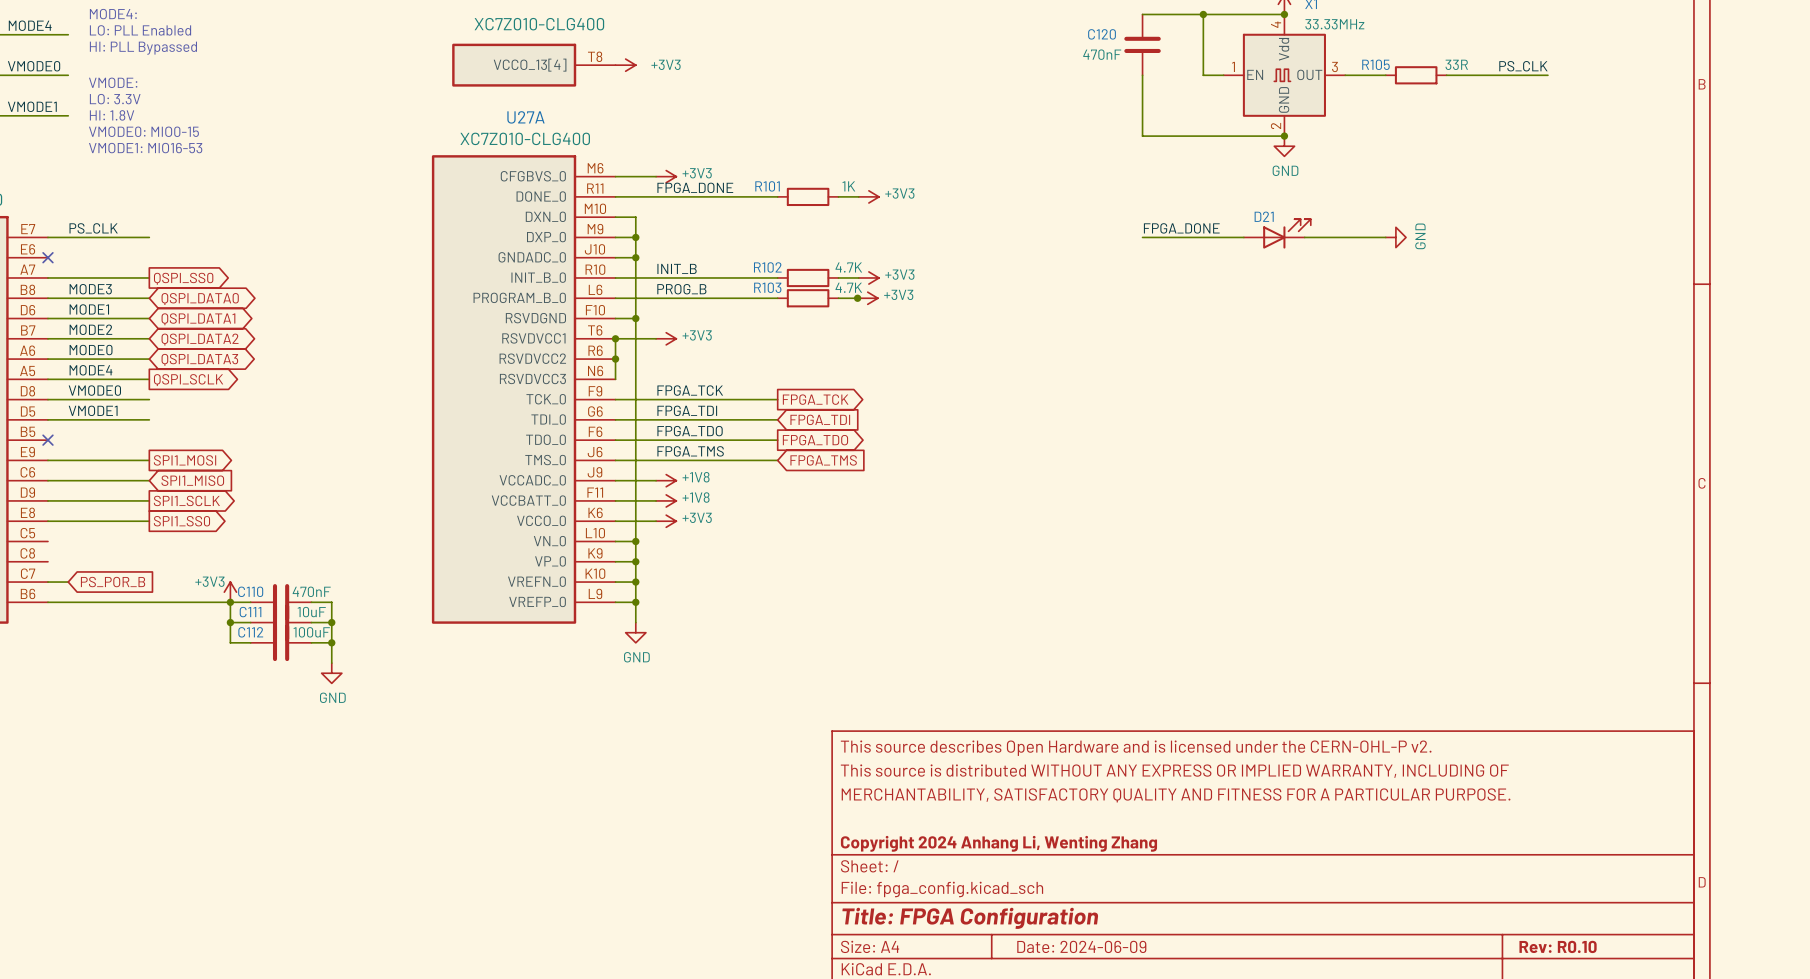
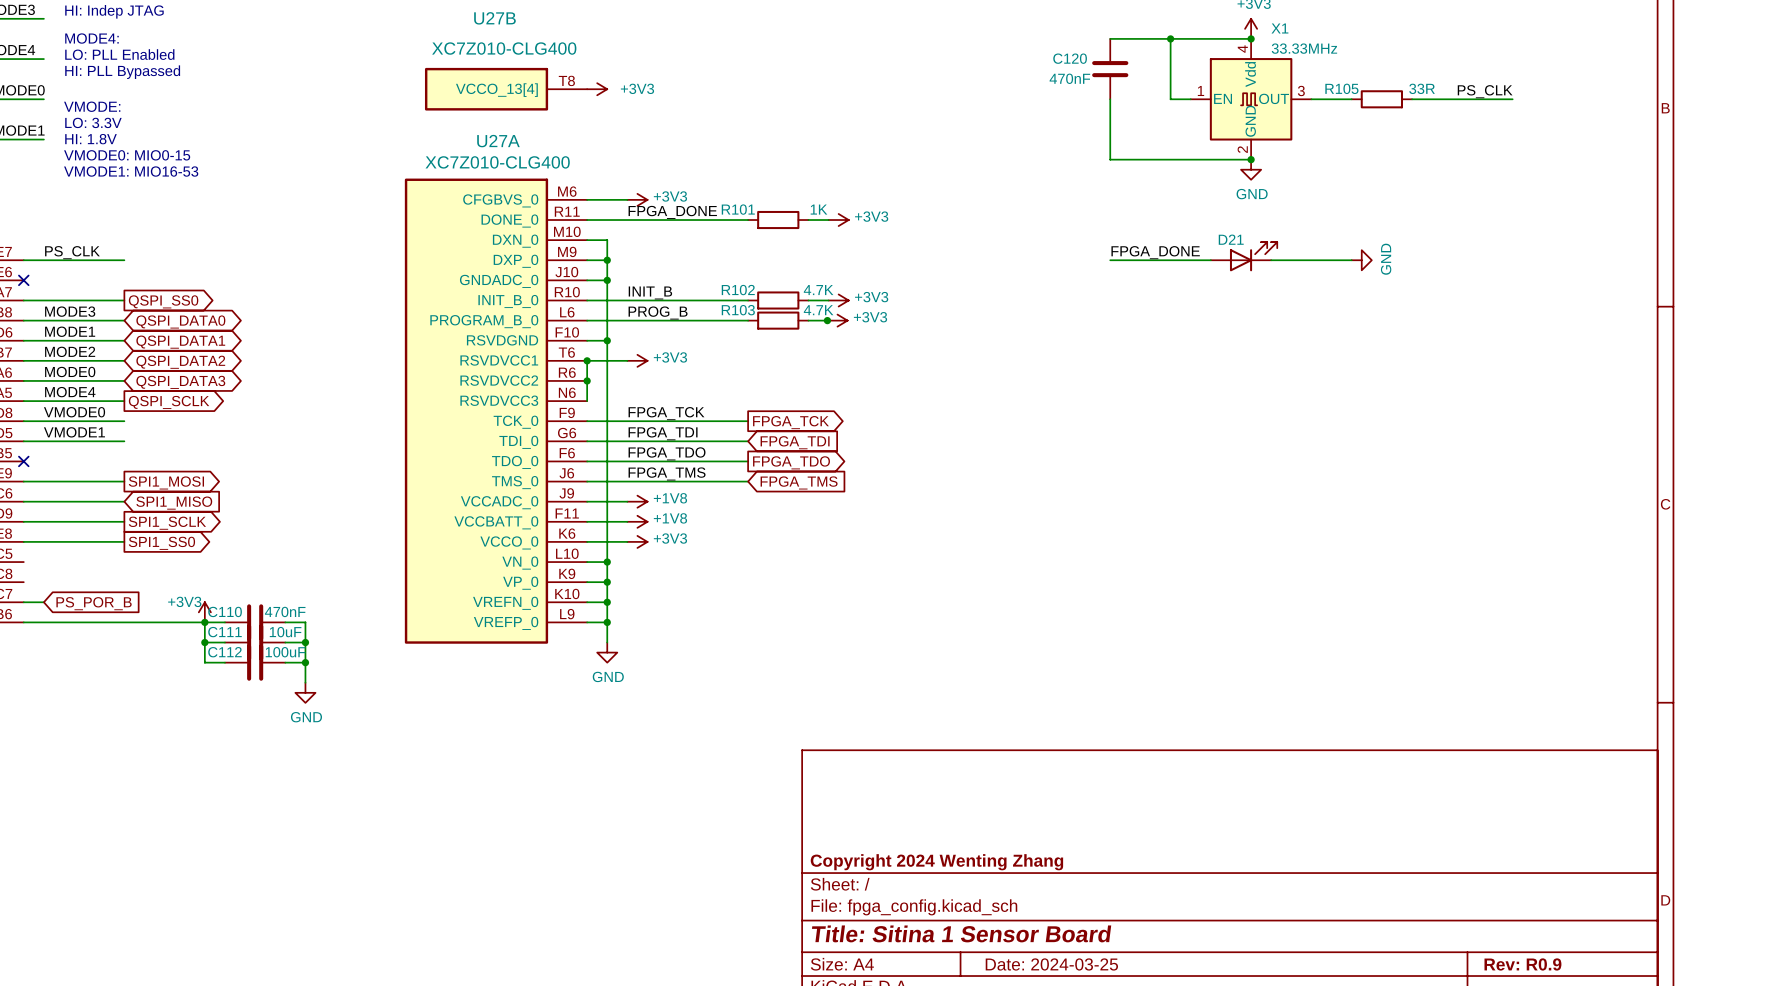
title block: This source describes Open Hardware and is licensed under the CERN-OHL-P v2. (1136, 748) -> none
title block: This source is distributed WITHOUT ANY EXPRESS OR IMPLIED WARRANTY, INCLUDING OF (1174, 771) -> none
title block: MERCHANTABILITY, SATISFACTORY QUALITY AND FITNESS FOR A PARTICULAR PURPOSE. (1176, 795) -> none
title block: Copyright 2024 Anhang Li, Wenting Zhang (998, 843) -> Copyright 2024 Wenting Zhang (936, 862)
title block: Title: FPGA Configuration (970, 918) -> Title: Sitina 1 Sensor Board (961, 933)
title block: Date: 2024-06-09 (1081, 946) -> Date: 2024-03-25 (1051, 964)
title block: Rev: R0.10 (1558, 946) -> Rev: R0.9 (1522, 964)

